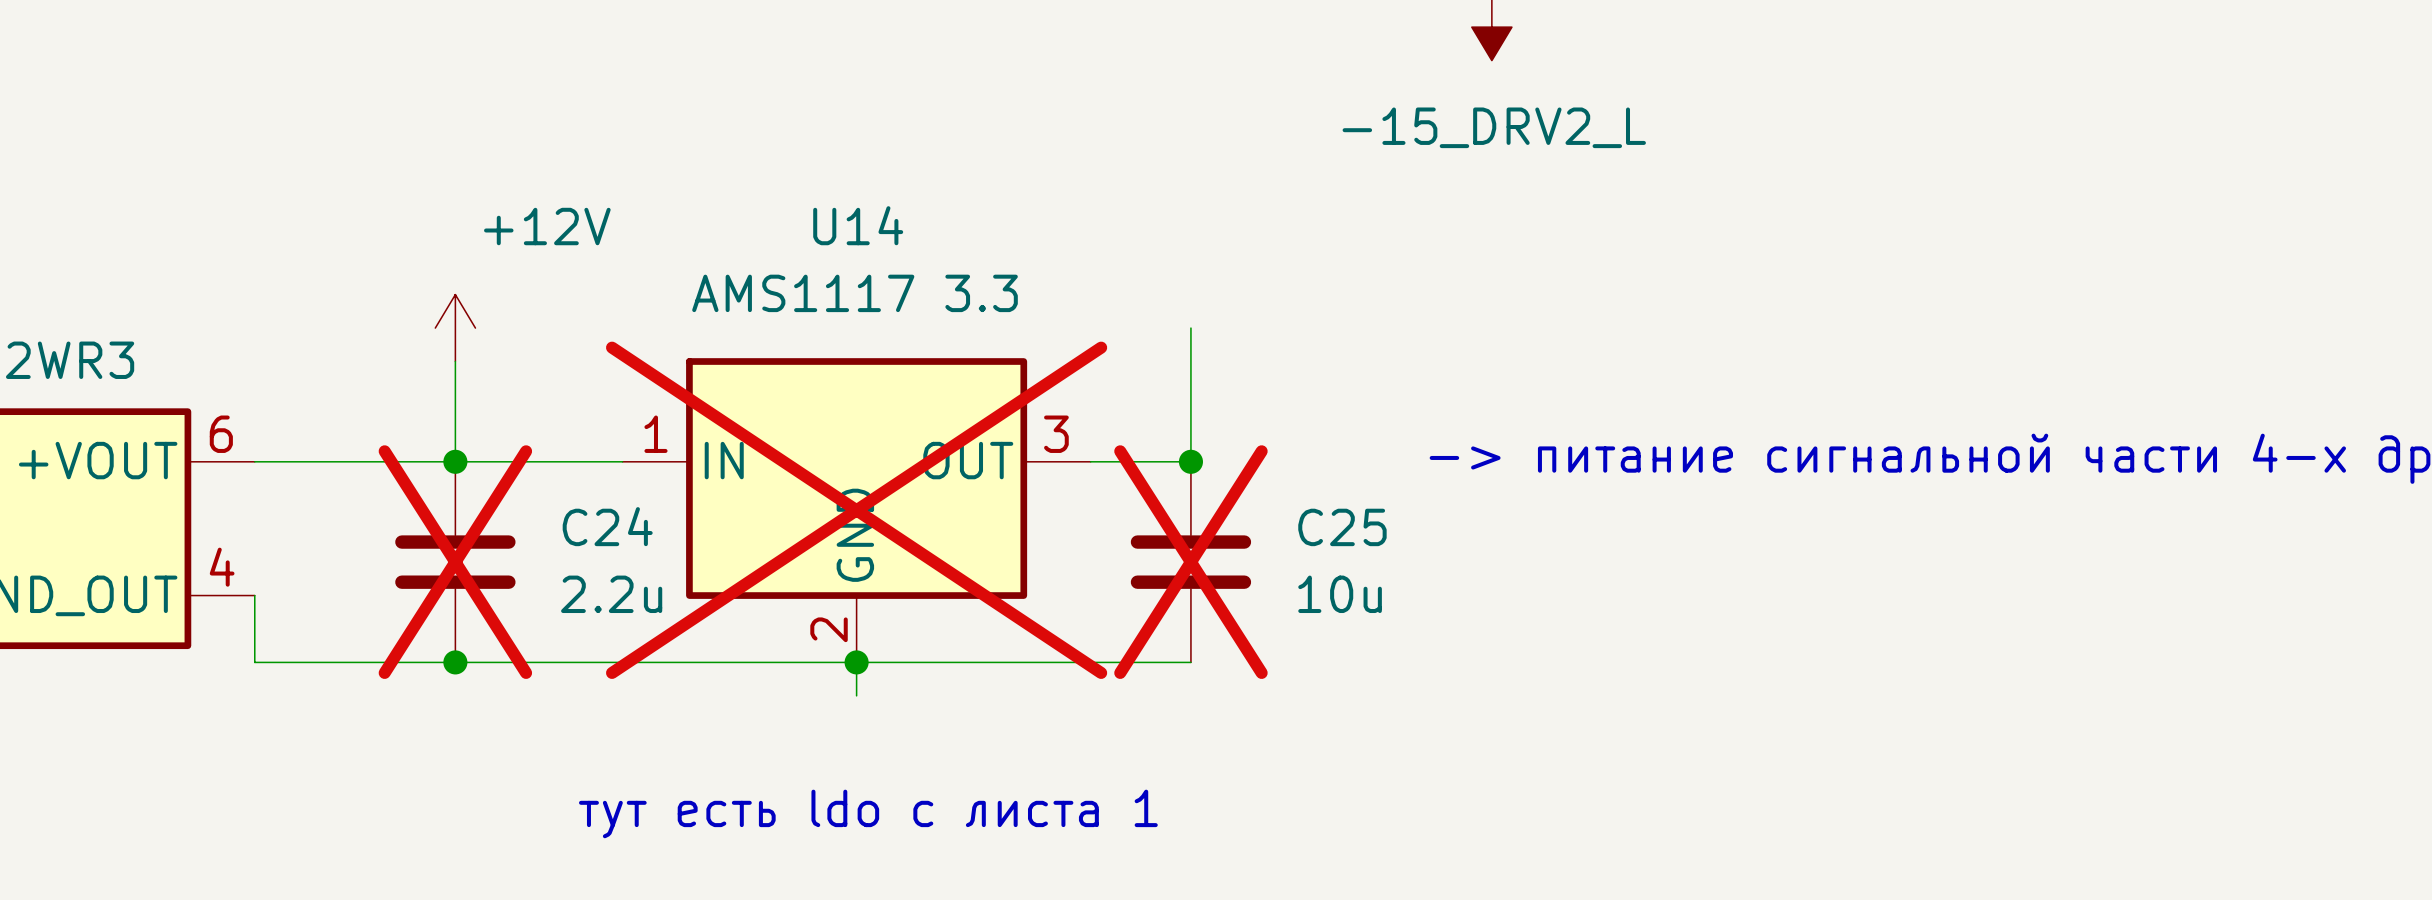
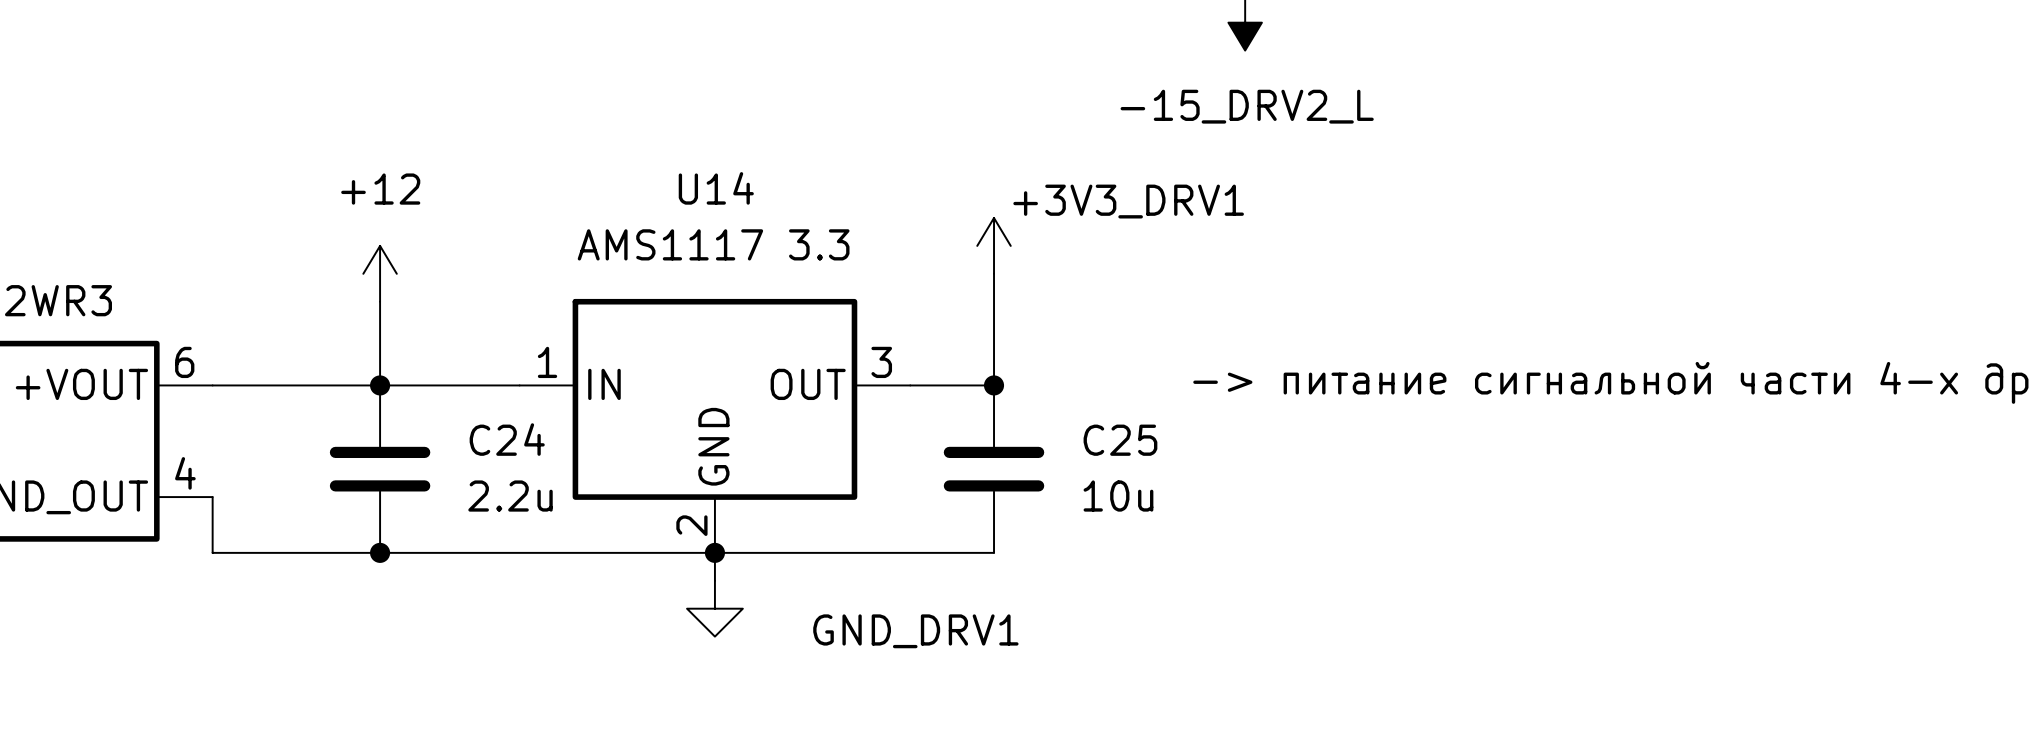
power symbol: none -> +3V3_DRV1 (994, 245)
power symbol: +12V (455, 328) -> +12 (380, 273)
U14 do-not-place cross: (856, 510) -> none
C24 do-not-place cross: (455, 562) -> none
C25 do-not-place cross: (1190, 562) -> none
power symbol: none -> GND_DRV1 (714, 608)
text: тут есть ldo с листа 1 (868, 813) -> none

